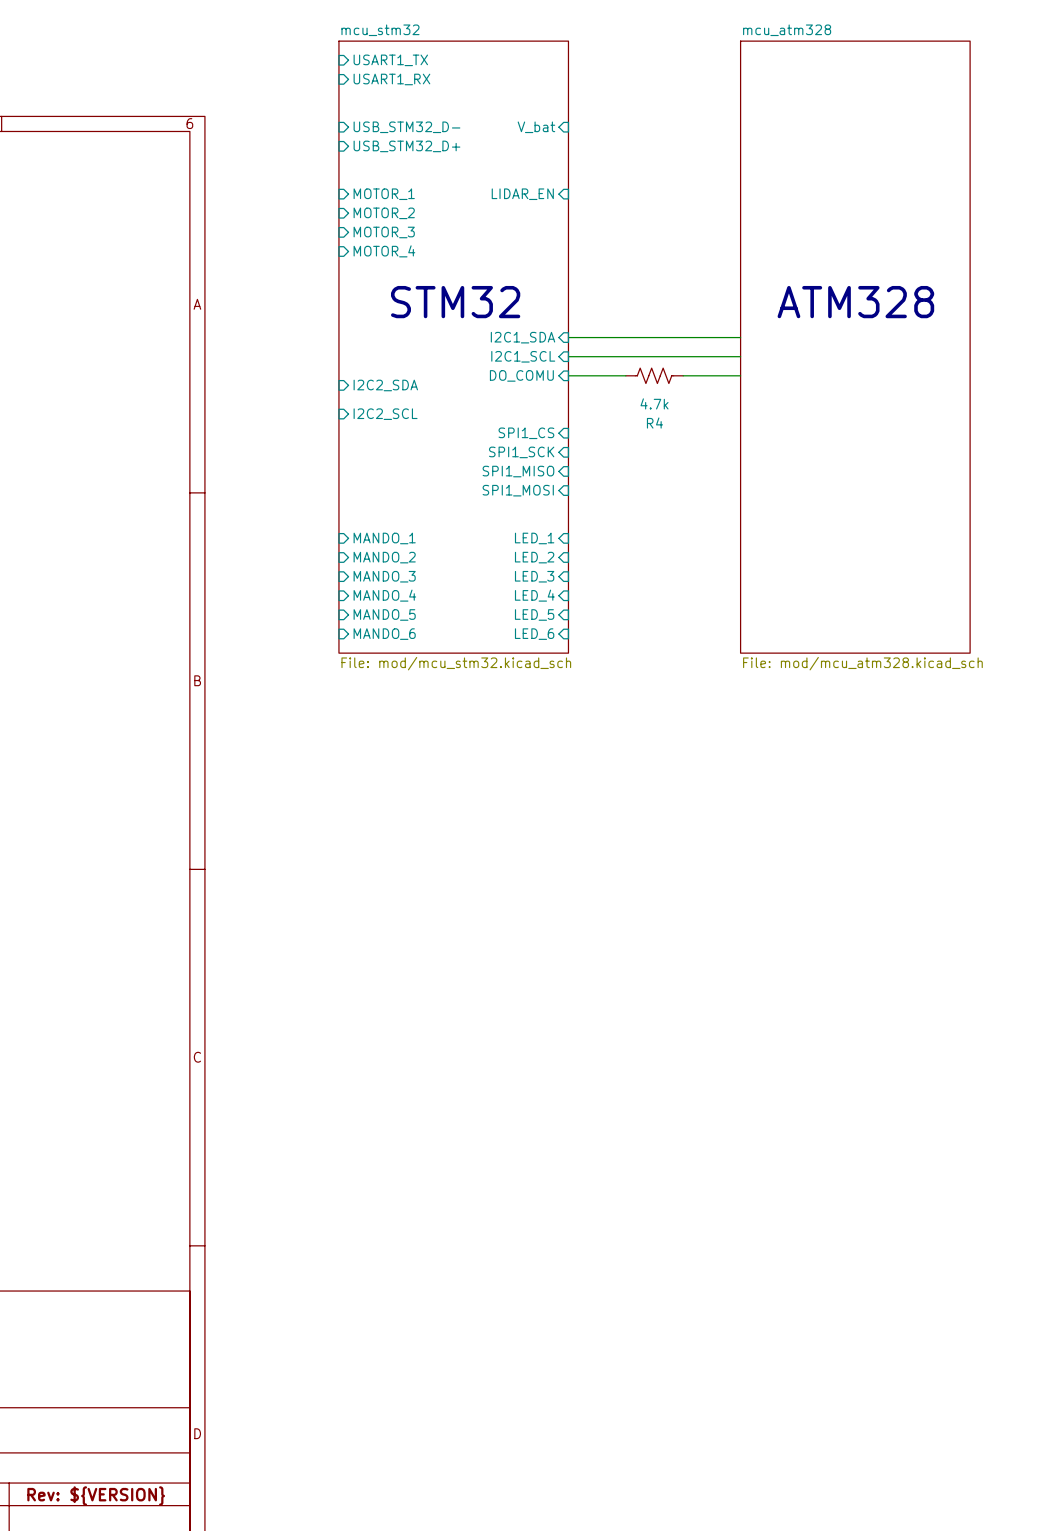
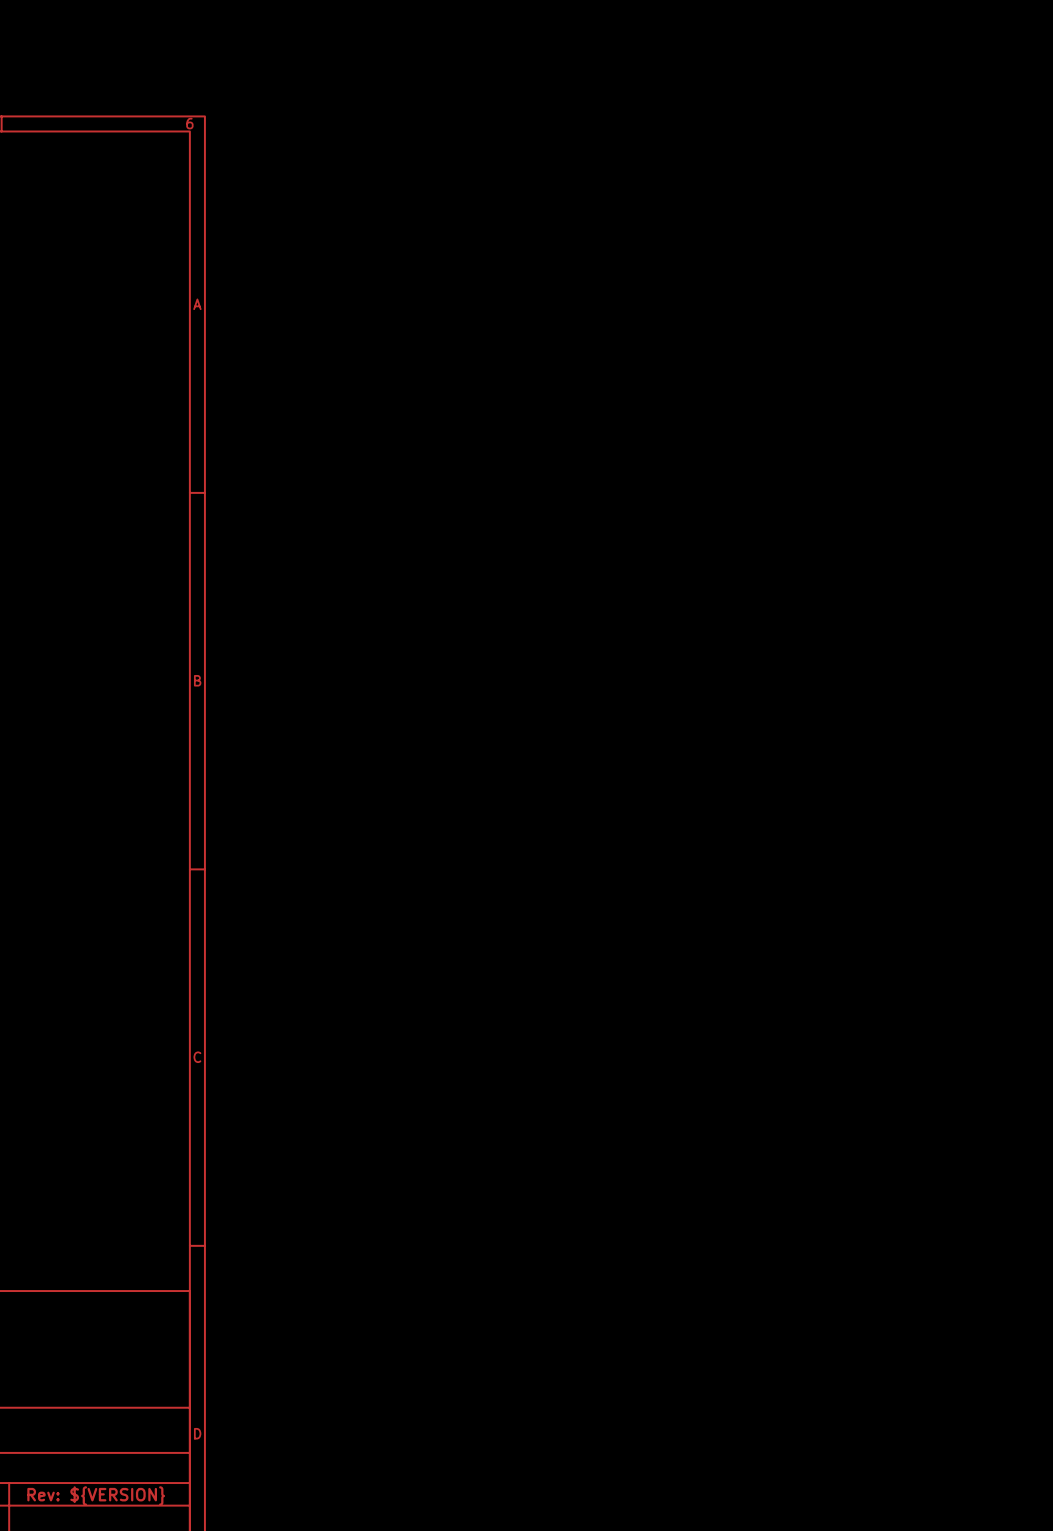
sheet pin: USART1_TX (390, 60) -> none
sheet pin: USART1_RX (391, 79) -> none
sheet pin: USB_STM32_D- (406, 127) -> none
sheet pin: V_bat (536, 127) -> none
sheet pin: USB_STM32_D+ (406, 146) -> none
sheet pin: MOTOR_1 (384, 194) -> none
sheet pin: LIDAR_EN (522, 194) -> none
sheet pin: MOTOR_2 (384, 213) -> none
sheet pin: MOTOR_3 (384, 232) -> none
sheet pin: MOTOR_4 (384, 251) -> none
text: STM32 (455, 302) -> none
text: ATM328 (855, 302) -> none
sheet pin: I2C1_SDA (523, 337) -> none
wire: (568, 337) (740, 337) -> none
sheet mcu_stm32: File: mod/mcu_stm32.kicad_sch (453, 347) -> none
sheet mcu_atm328: File: mod/mcu_atm328.kicad_sch (855, 347) -> none
sheet pin: I2C1_SCL (523, 356) -> none
wire: (568, 356) (740, 356) -> none
sheet pin: DO_COMU (521, 375) -> none
wire: (568, 375) (625, 375) -> none
R4: 4.7k (654, 375) -> none
wire: (683, 375) (740, 375) -> none
sheet pin: I2C2_SDA (385, 385) -> none
sheet pin: I2C2_SCL (385, 414) -> none
sheet pin: SPI1_CS (526, 433) -> none
sheet pin: SPI1_SCK (521, 452) -> none
sheet pin: SPI1_MISO (518, 471) -> none
sheet pin: SPI1_MOSI (518, 490) -> none
sheet pin: MANDO_1 (384, 538) -> none
sheet pin: LED_1 (534, 538) -> none
sheet pin: MANDO_2 (384, 557) -> none
sheet pin: LED_2 (534, 557) -> none
sheet pin: MANDO_3 (384, 576) -> none
sheet pin: LED_3 (534, 576) -> none
sheet pin: MANDO_4 (384, 595) -> none
sheet pin: LED_4 (534, 595) -> none
sheet pin: MANDO_5 (384, 614) -> none
sheet pin: LED_5 (534, 614) -> none
sheet pin: MANDO_6 (384, 634) -> none
sheet pin: LED_6 (534, 634) -> none

